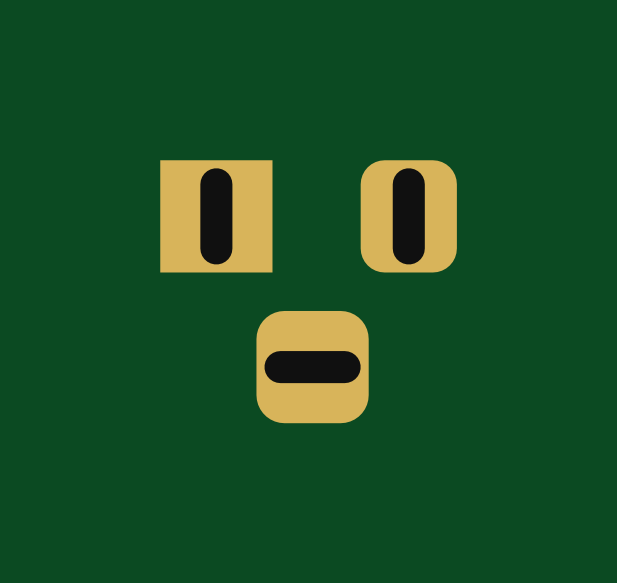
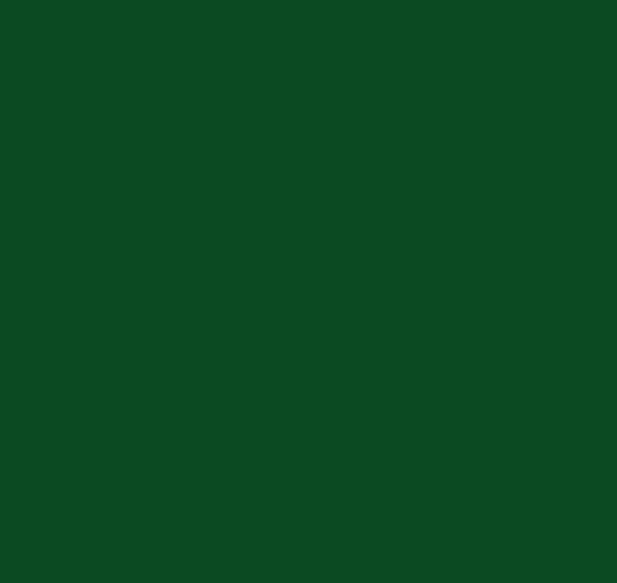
part: (308, 291) -> none

